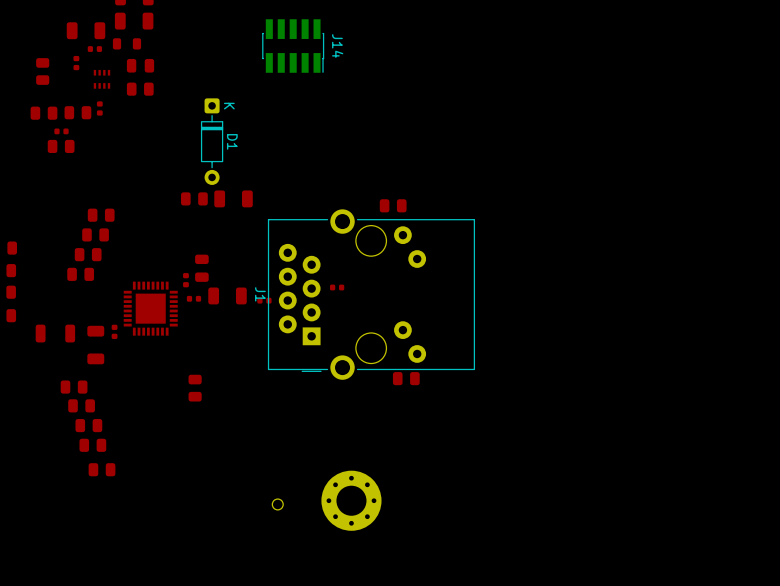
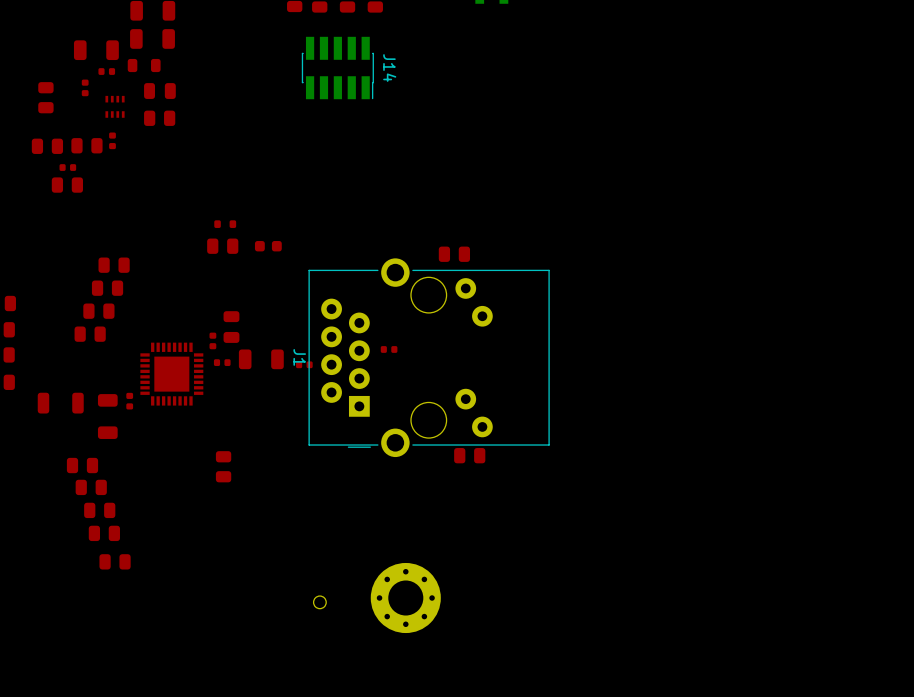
D1: (212, 141) -> none
part: none -> (225, 224)
part footprint: [214, 190, 253, 208] -> [254, 241, 282, 252]

